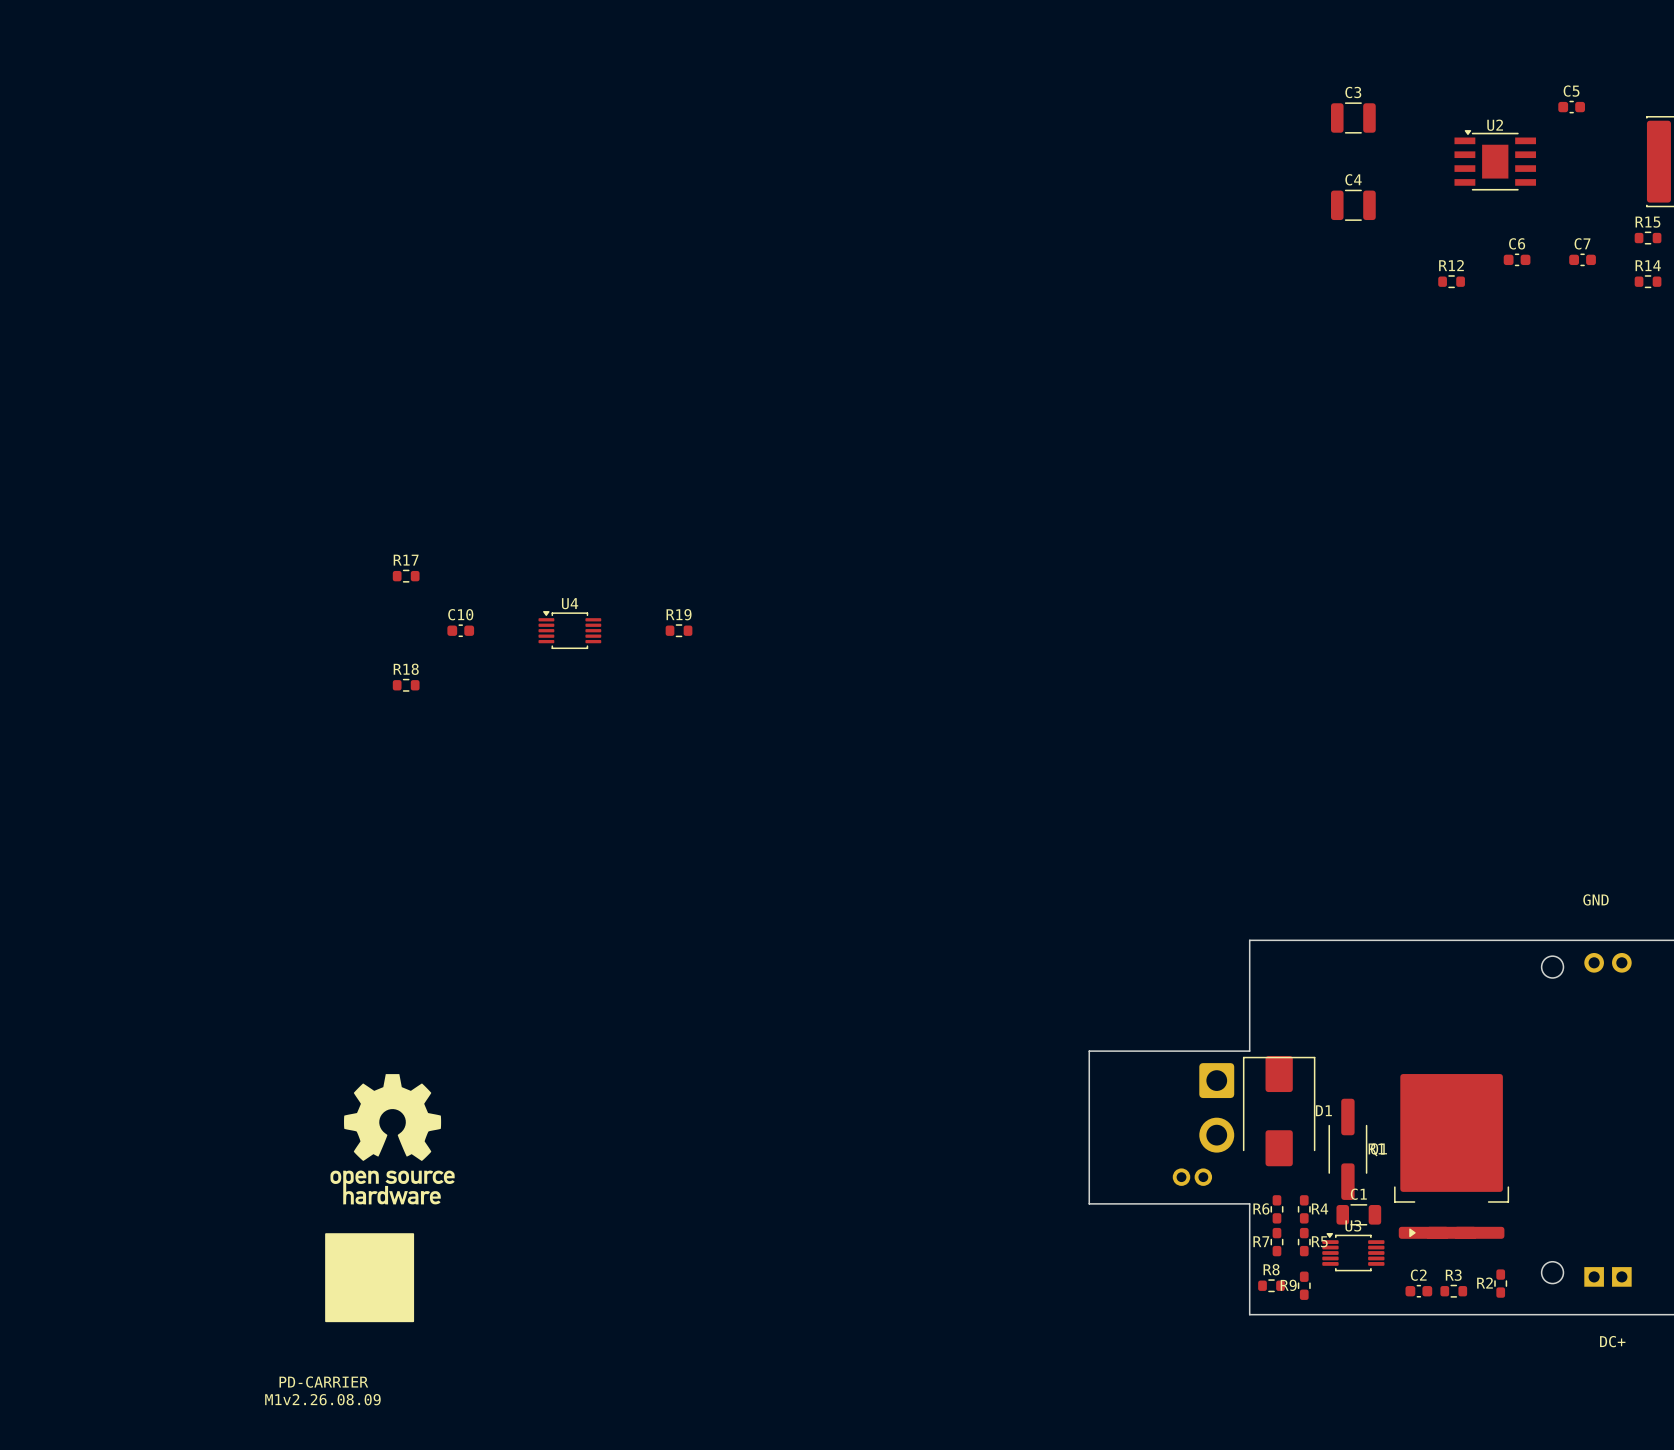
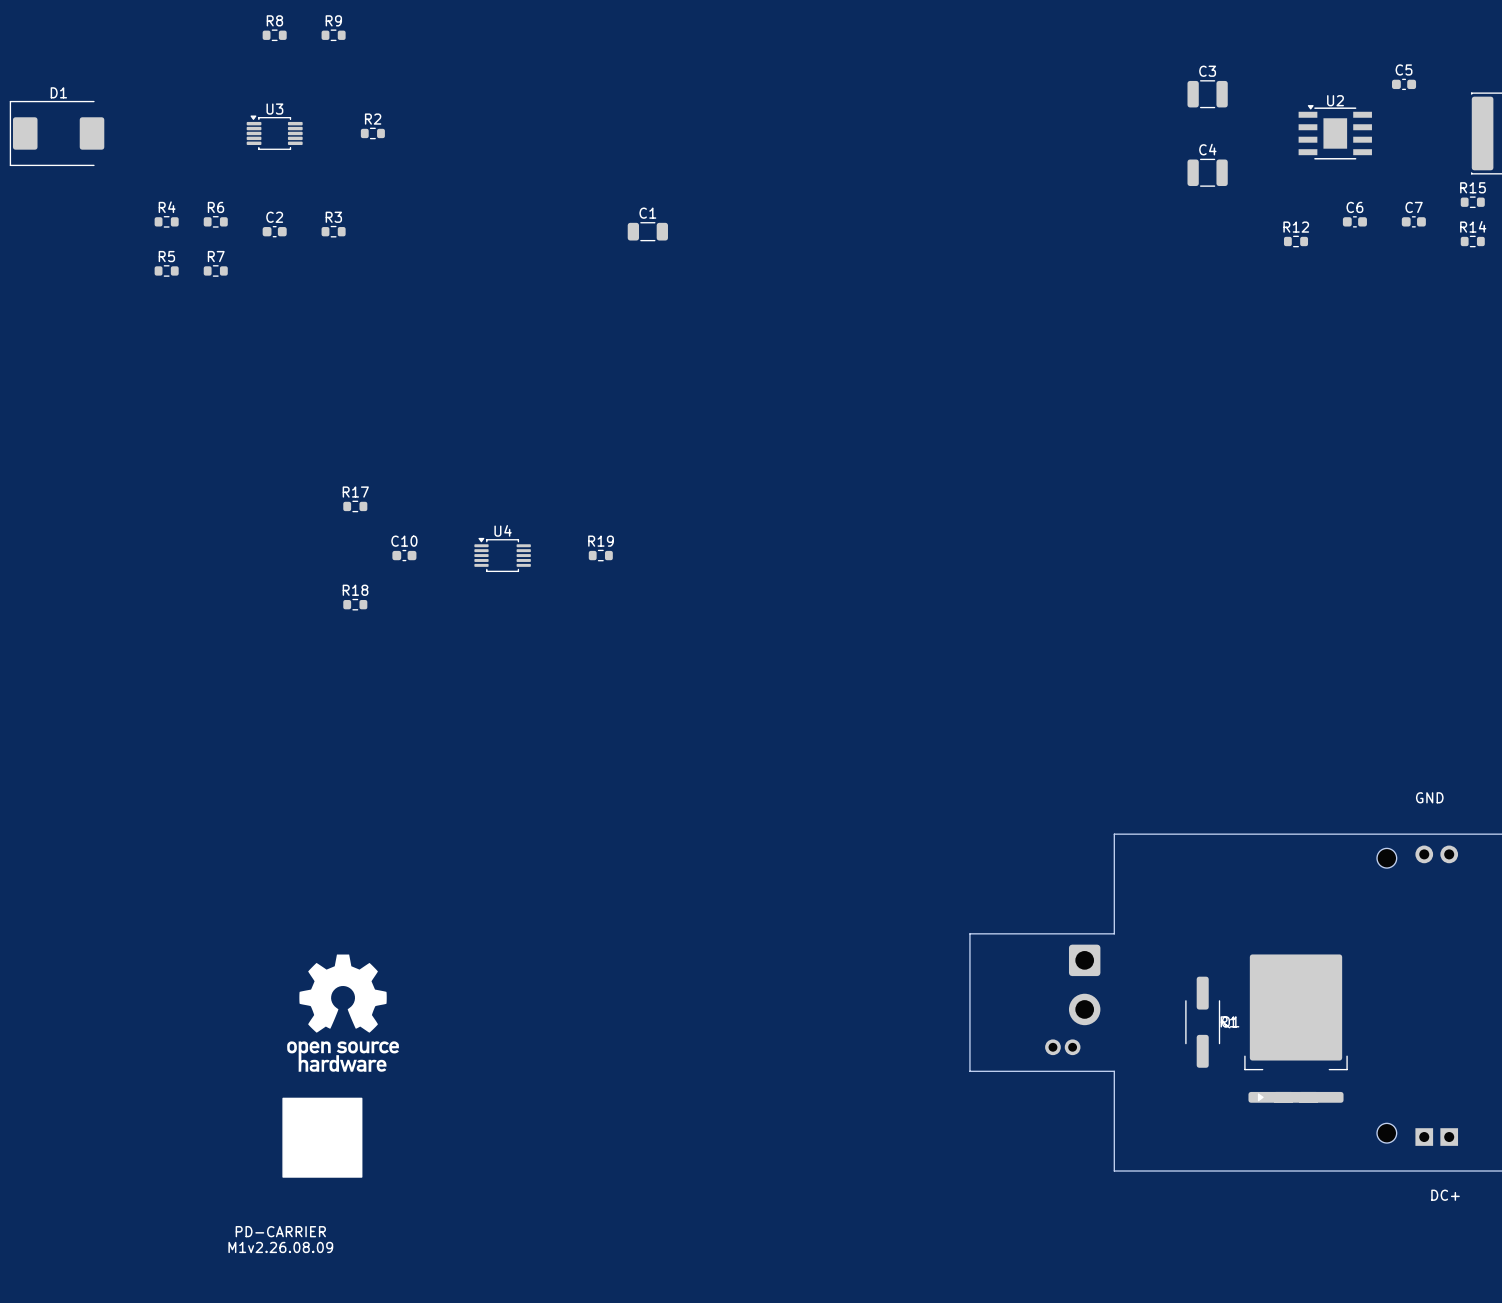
D1 footprint: [1243, 1056, 1316, 1167] -> [9, 100, 105, 166]
D1 name position: D1 (1323, 1110) -> D1 (58, 92)
R6 footprint: [1270, 1195, 1284, 1224] -> [203, 216, 228, 228]
R4 footprint: [1297, 1195, 1311, 1224] -> [154, 216, 179, 228]
R6 name position: R6 (1261, 1208) -> R6 (215, 207)
R4 name position: R4 (1320, 1208) -> R4 (167, 207)
C1 position: (1358, 1214) -> (647, 231)
R7 footprint: [1270, 1227, 1284, 1257] -> [203, 265, 228, 277]
R5 footprint: [1297, 1227, 1311, 1257] -> [154, 265, 179, 277]
R7 name position: R7 (1261, 1241) -> R7 (216, 256)
R5 name position: R5 (1319, 1241) -> R5 (166, 256)
U3 position: (1353, 1252) -> (274, 132)
R2 footprint: [1494, 1269, 1508, 1298] -> [360, 127, 385, 140]
R9 footprint: [1297, 1271, 1311, 1300] -> [321, 29, 346, 41]
R2 name position: R2 (1484, 1283) -> R2 (373, 119)
R8 position: (1271, 1285) -> (274, 35)
R9 name position: R9 (1288, 1285) -> R9 (333, 20)
C2 position: (1418, 1291) -> (274, 231)
R3 position: (1453, 1291) -> (333, 231)

